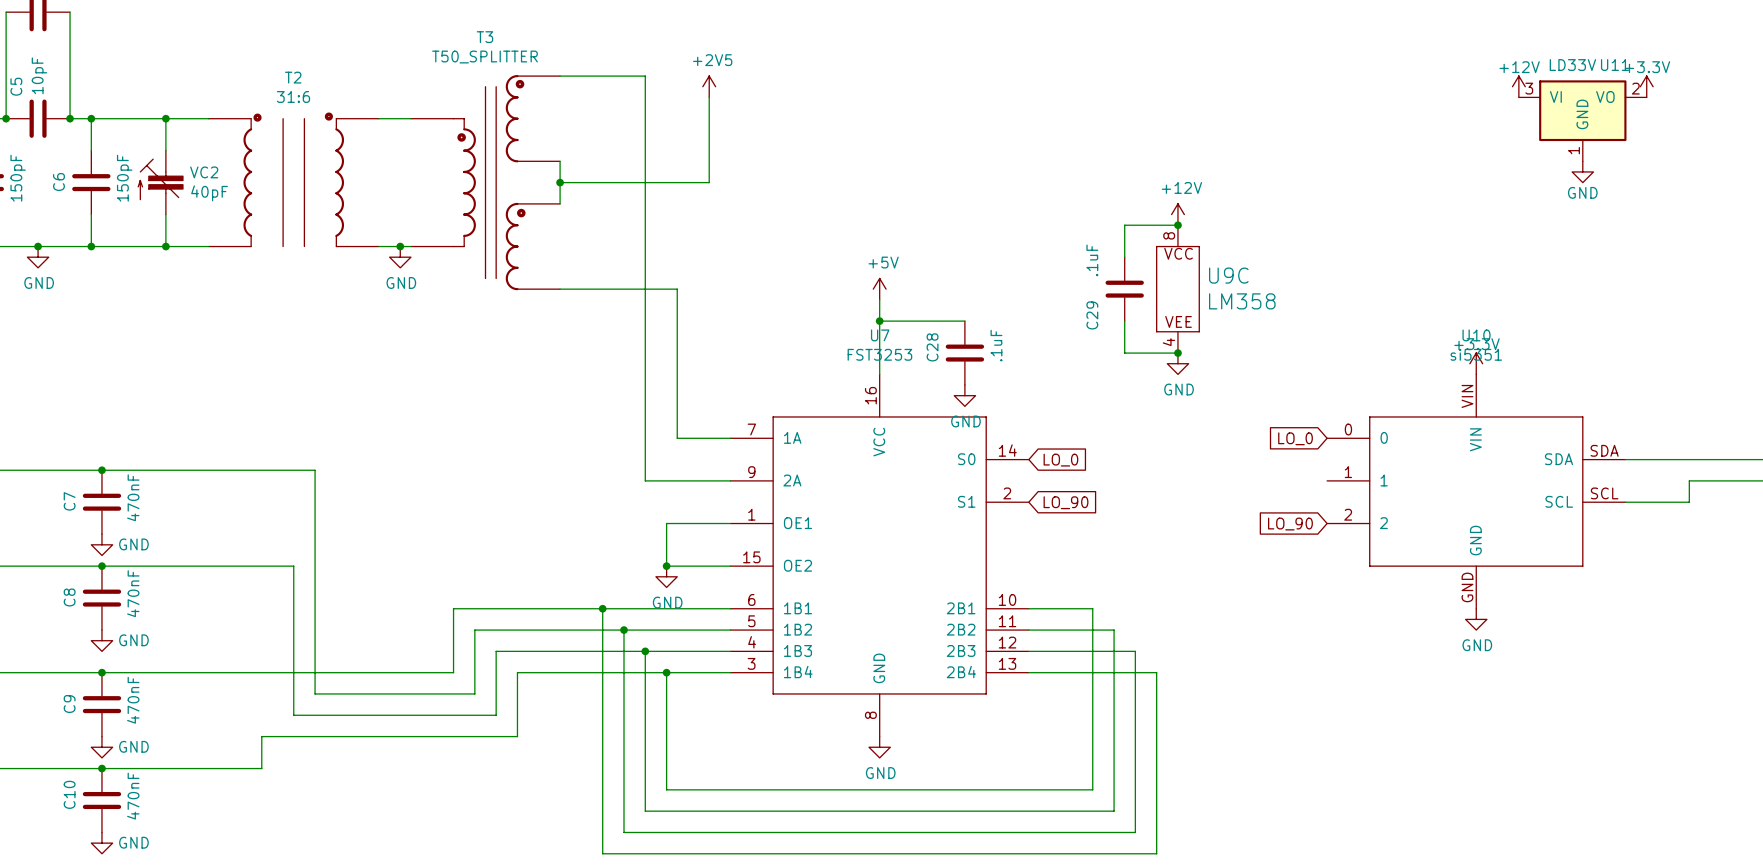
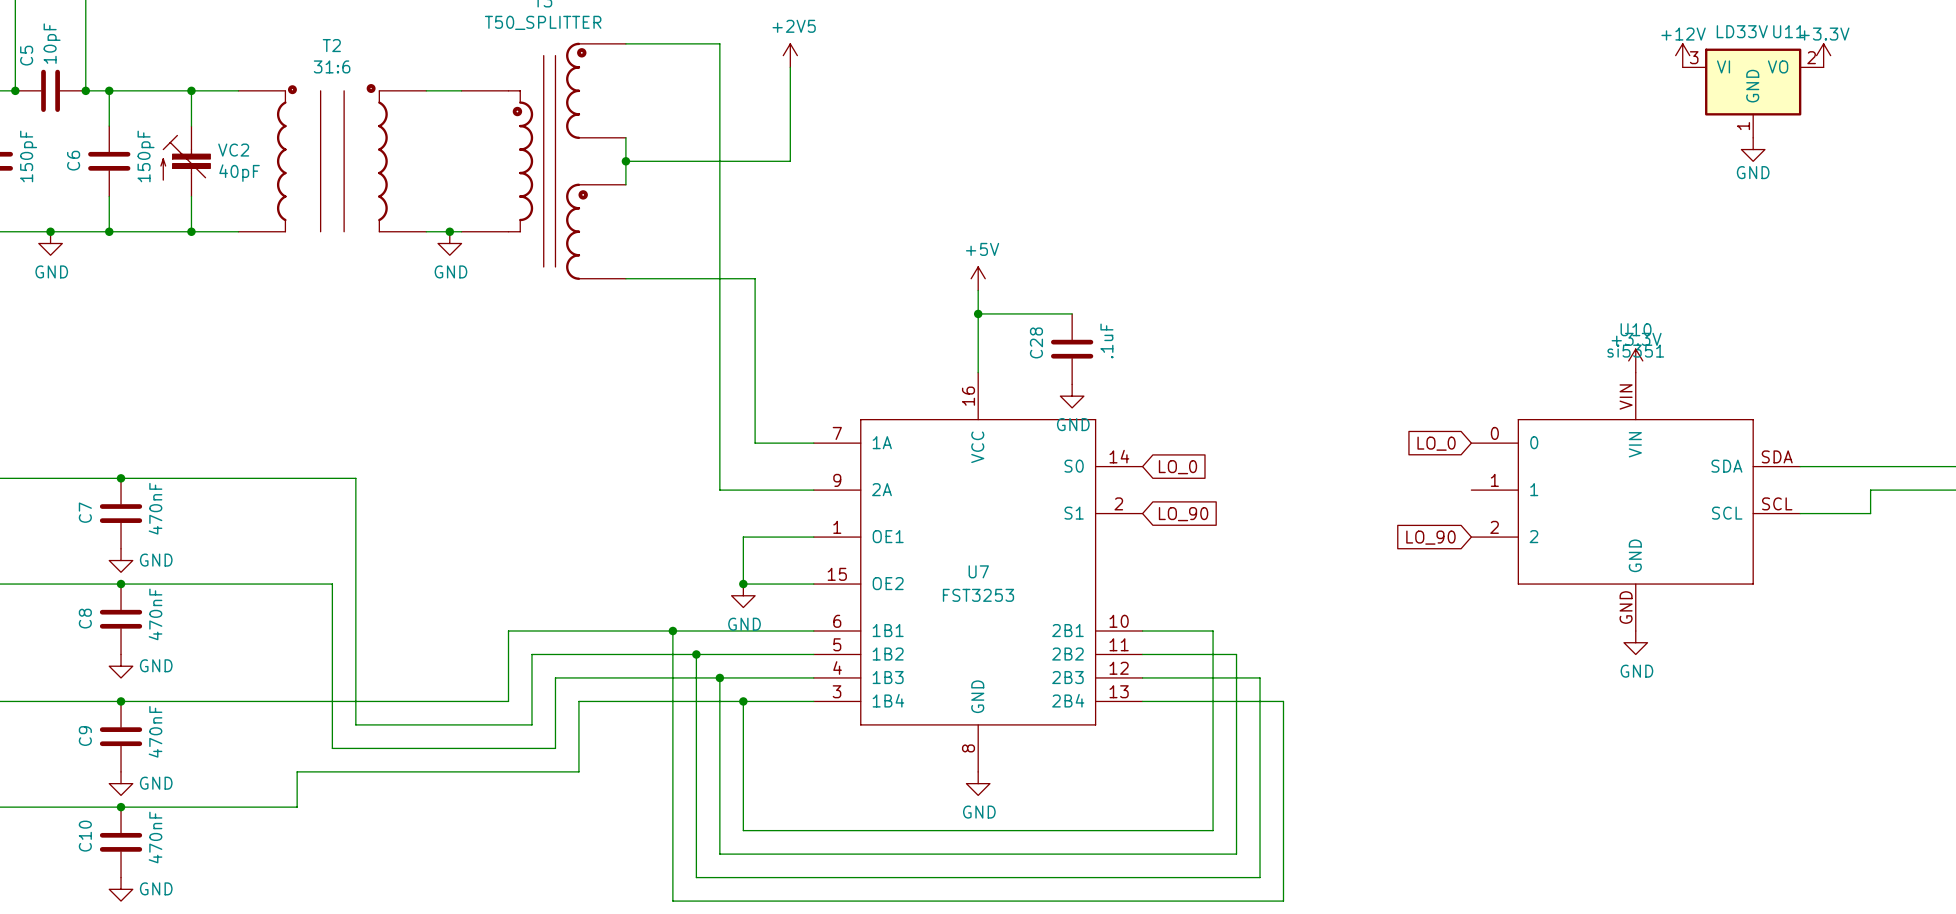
power symbol: +12V (1177, 214) -> none
wire: (1177, 225) (1124, 225) (1124, 257) -> none
junction: (1177, 225) -> none
C29: .1uF (1124, 289) -> none
U9C: LM358 (1177, 289) -> none
wire: (1124, 321) (1124, 353) (1177, 353) -> none
U7 name position: U7 (880, 335) -> U7 (978, 571)
junction: (1177, 353) -> none
U7 value position: FST3253 (879, 354) -> FST3253 (978, 595)
power symbol: GND (1177, 363) -> none

